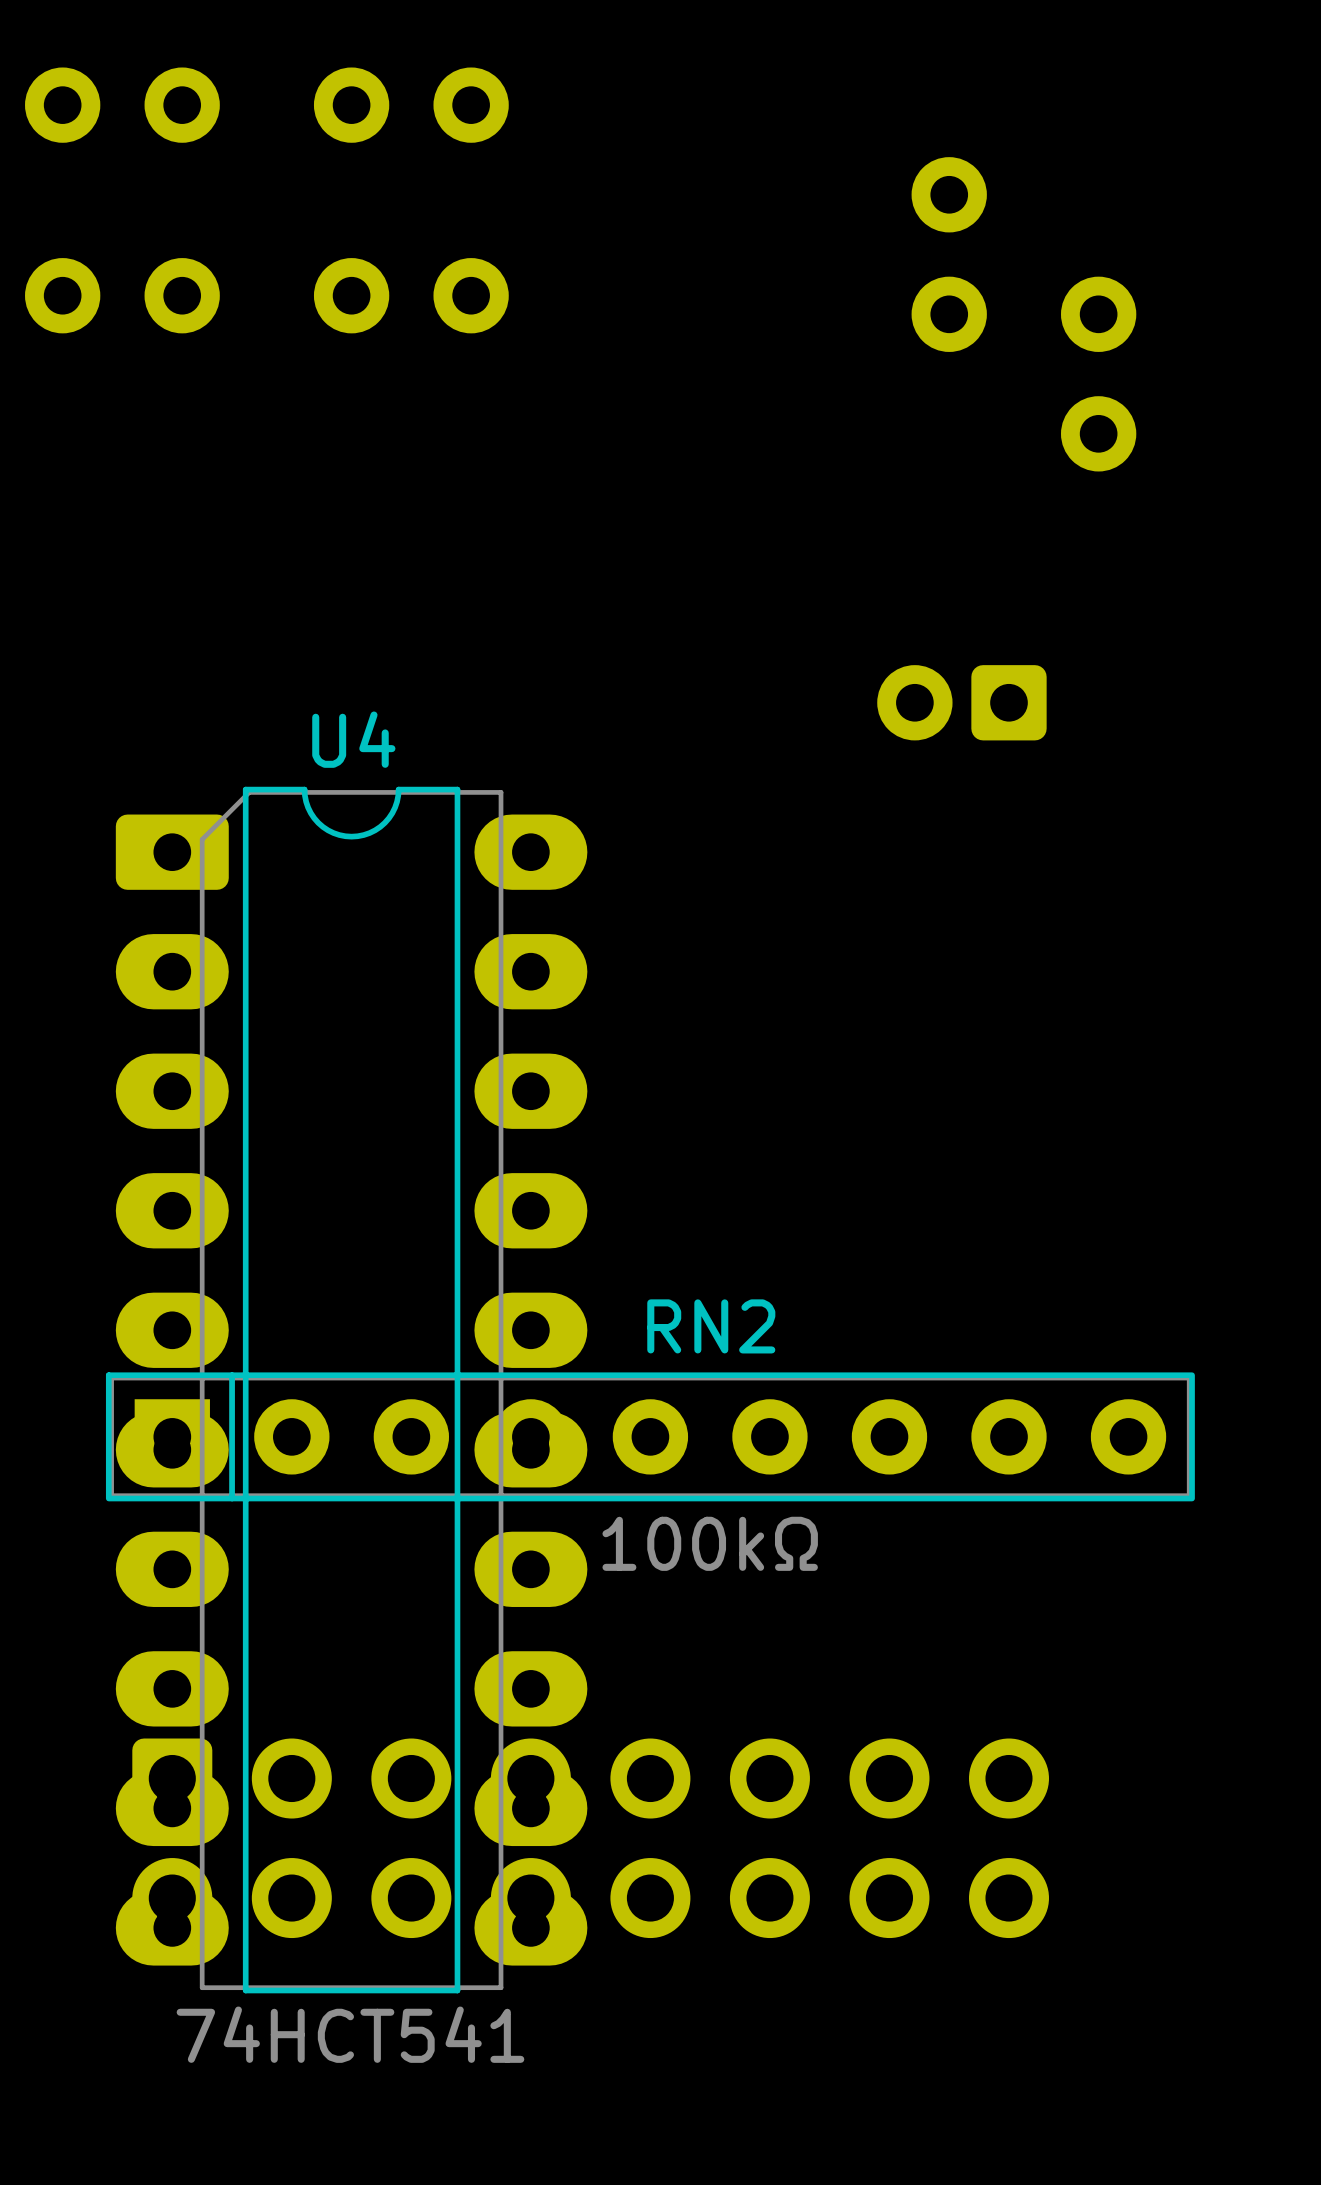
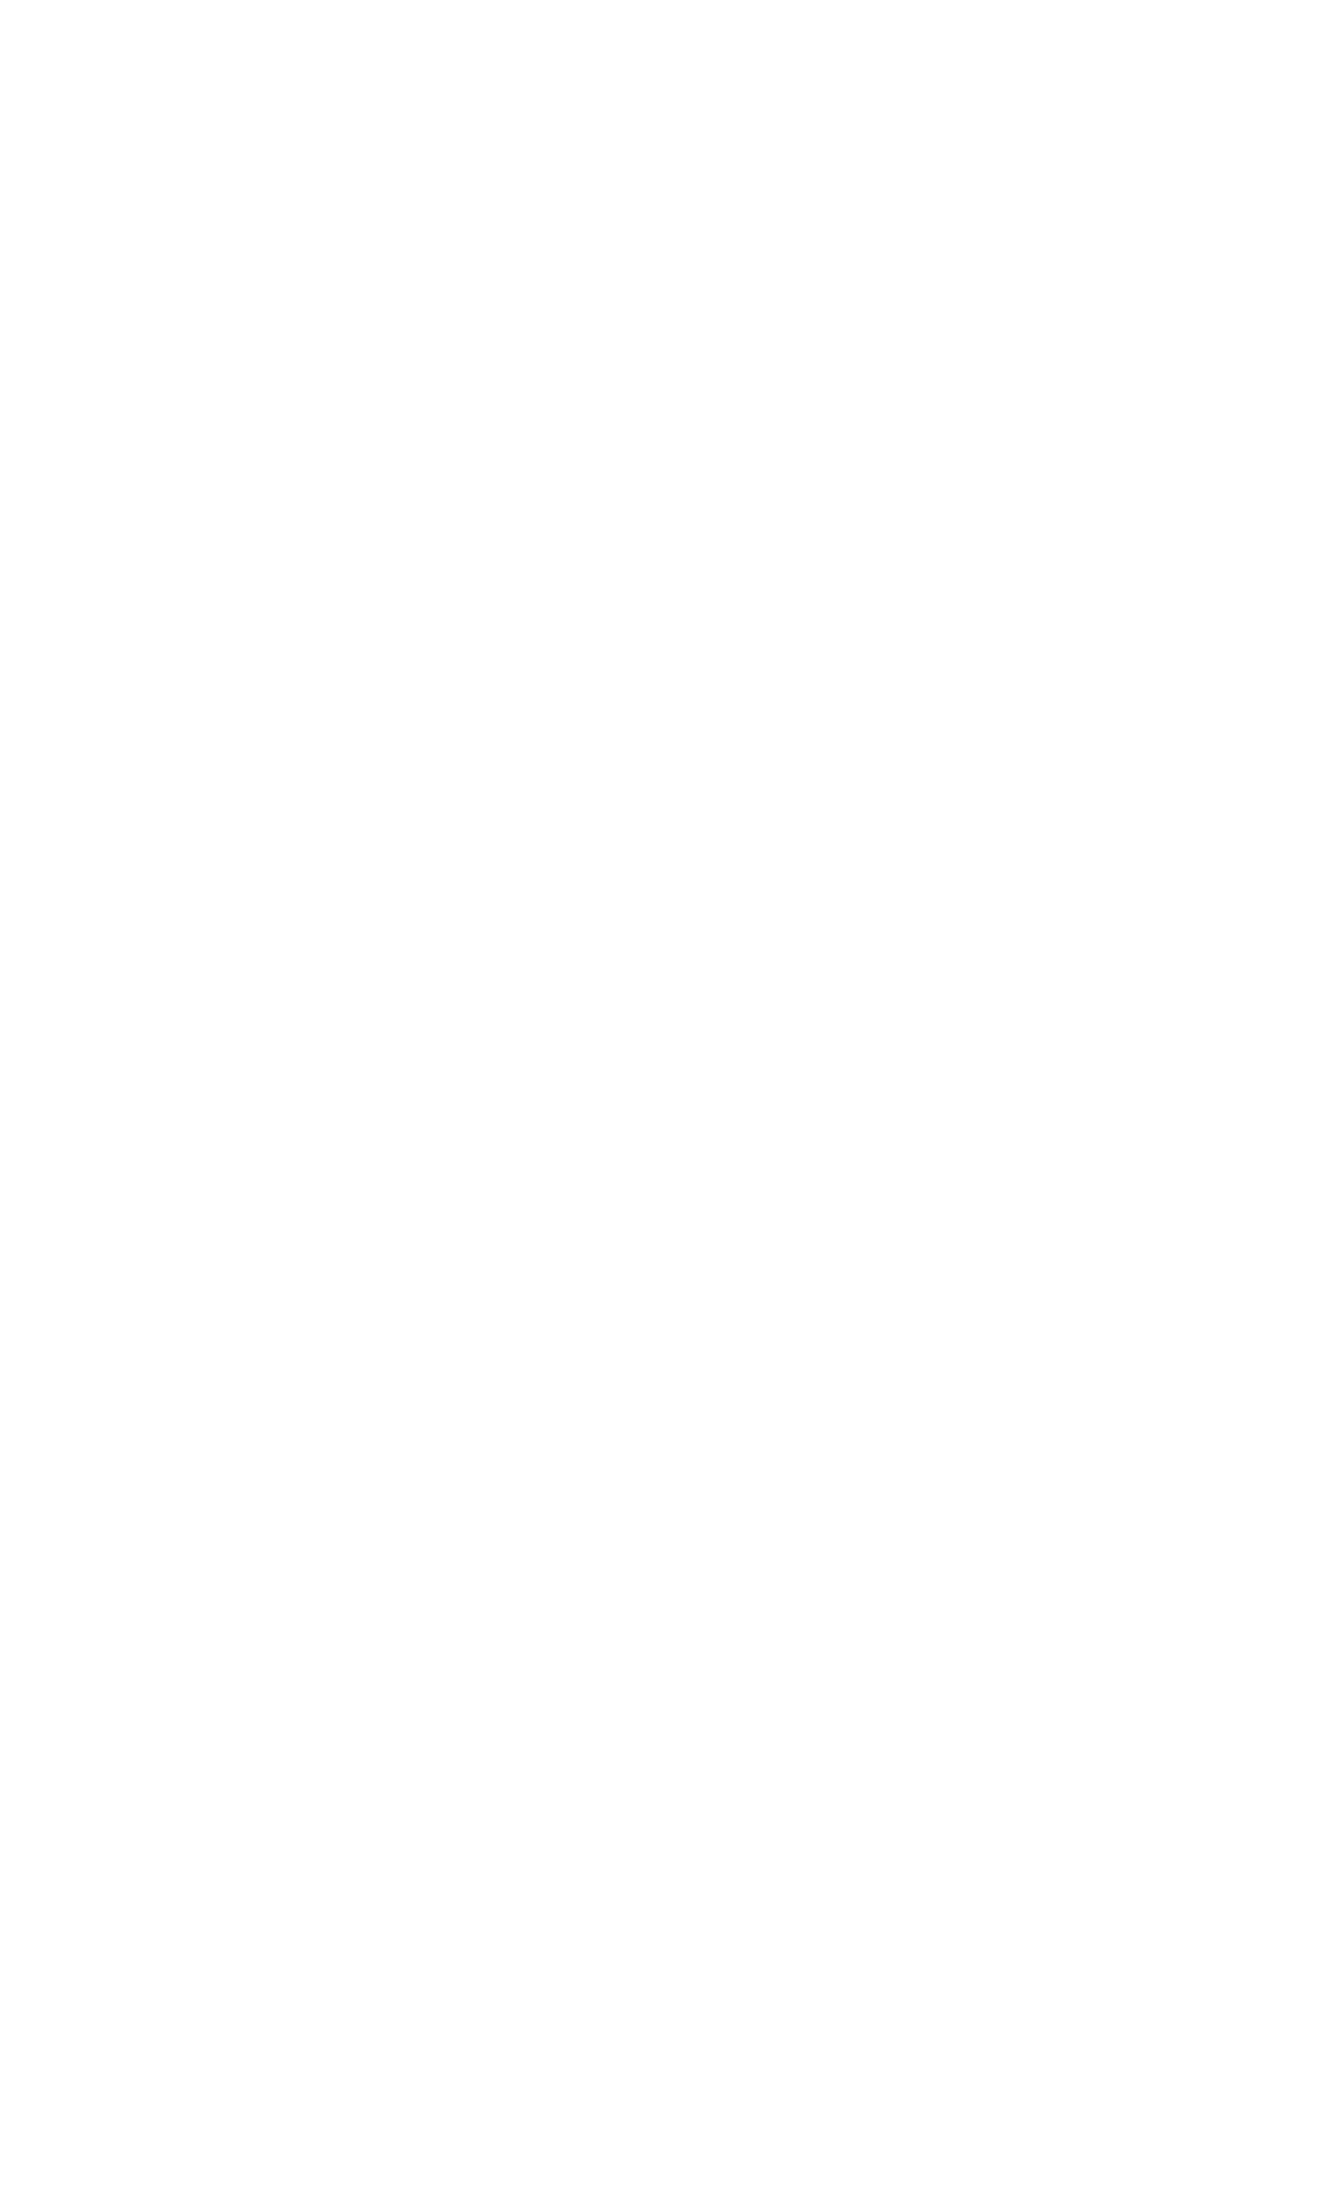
part: (122, 105) -> none
part: (411, 105) -> none
part: (949, 254) -> none
part: (122, 295) -> none
part: (411, 295) -> none
part: (1098, 374) -> none
part: (961, 702) -> none
U4: 74HCT541 (351, 1390) -> none
RN2: 100kΩ (650, 1436) -> none
part: (590, 1838) -> none

